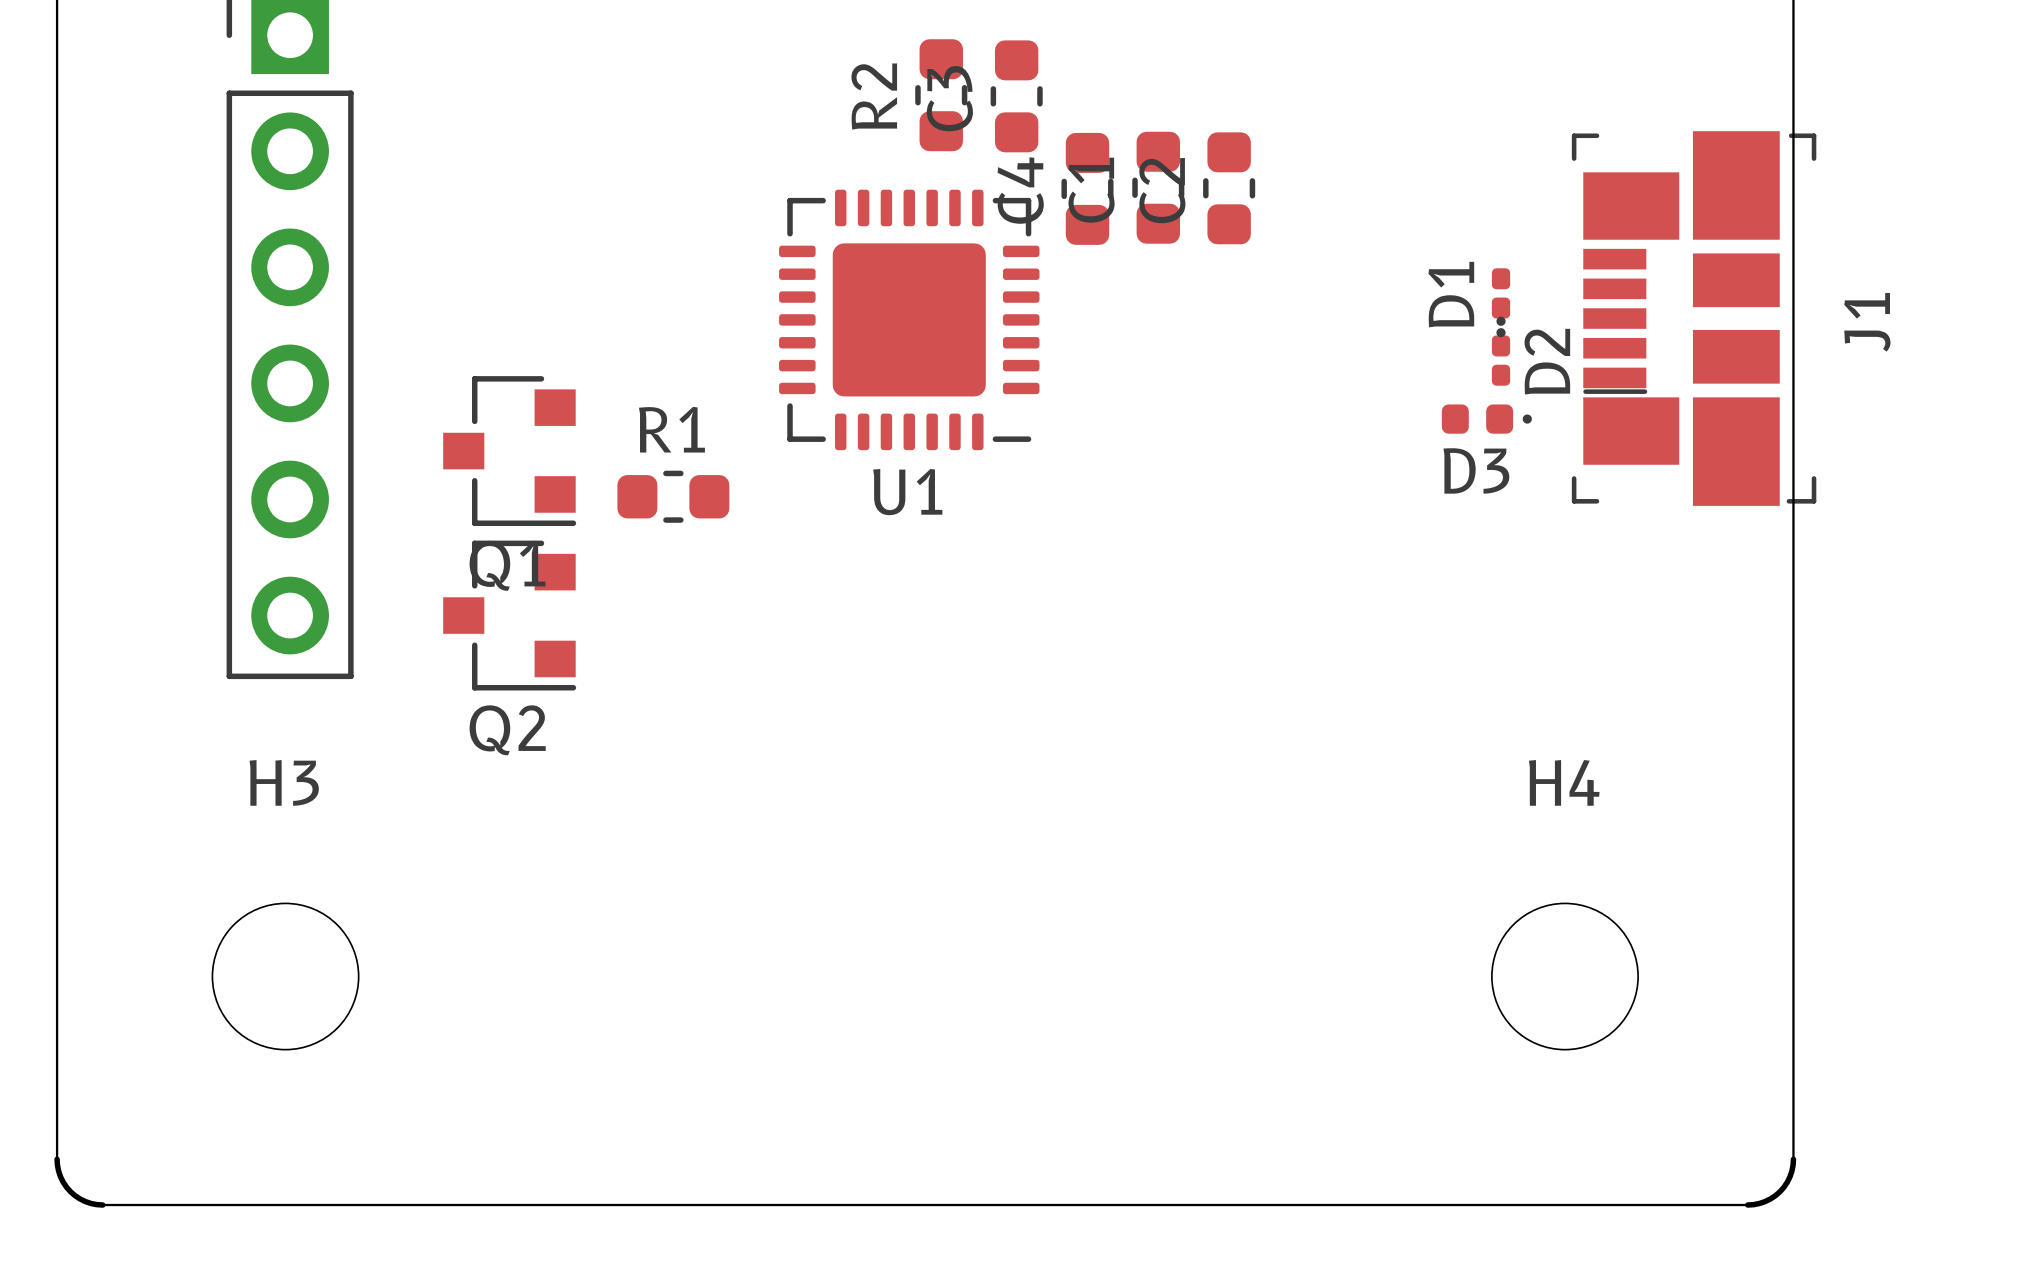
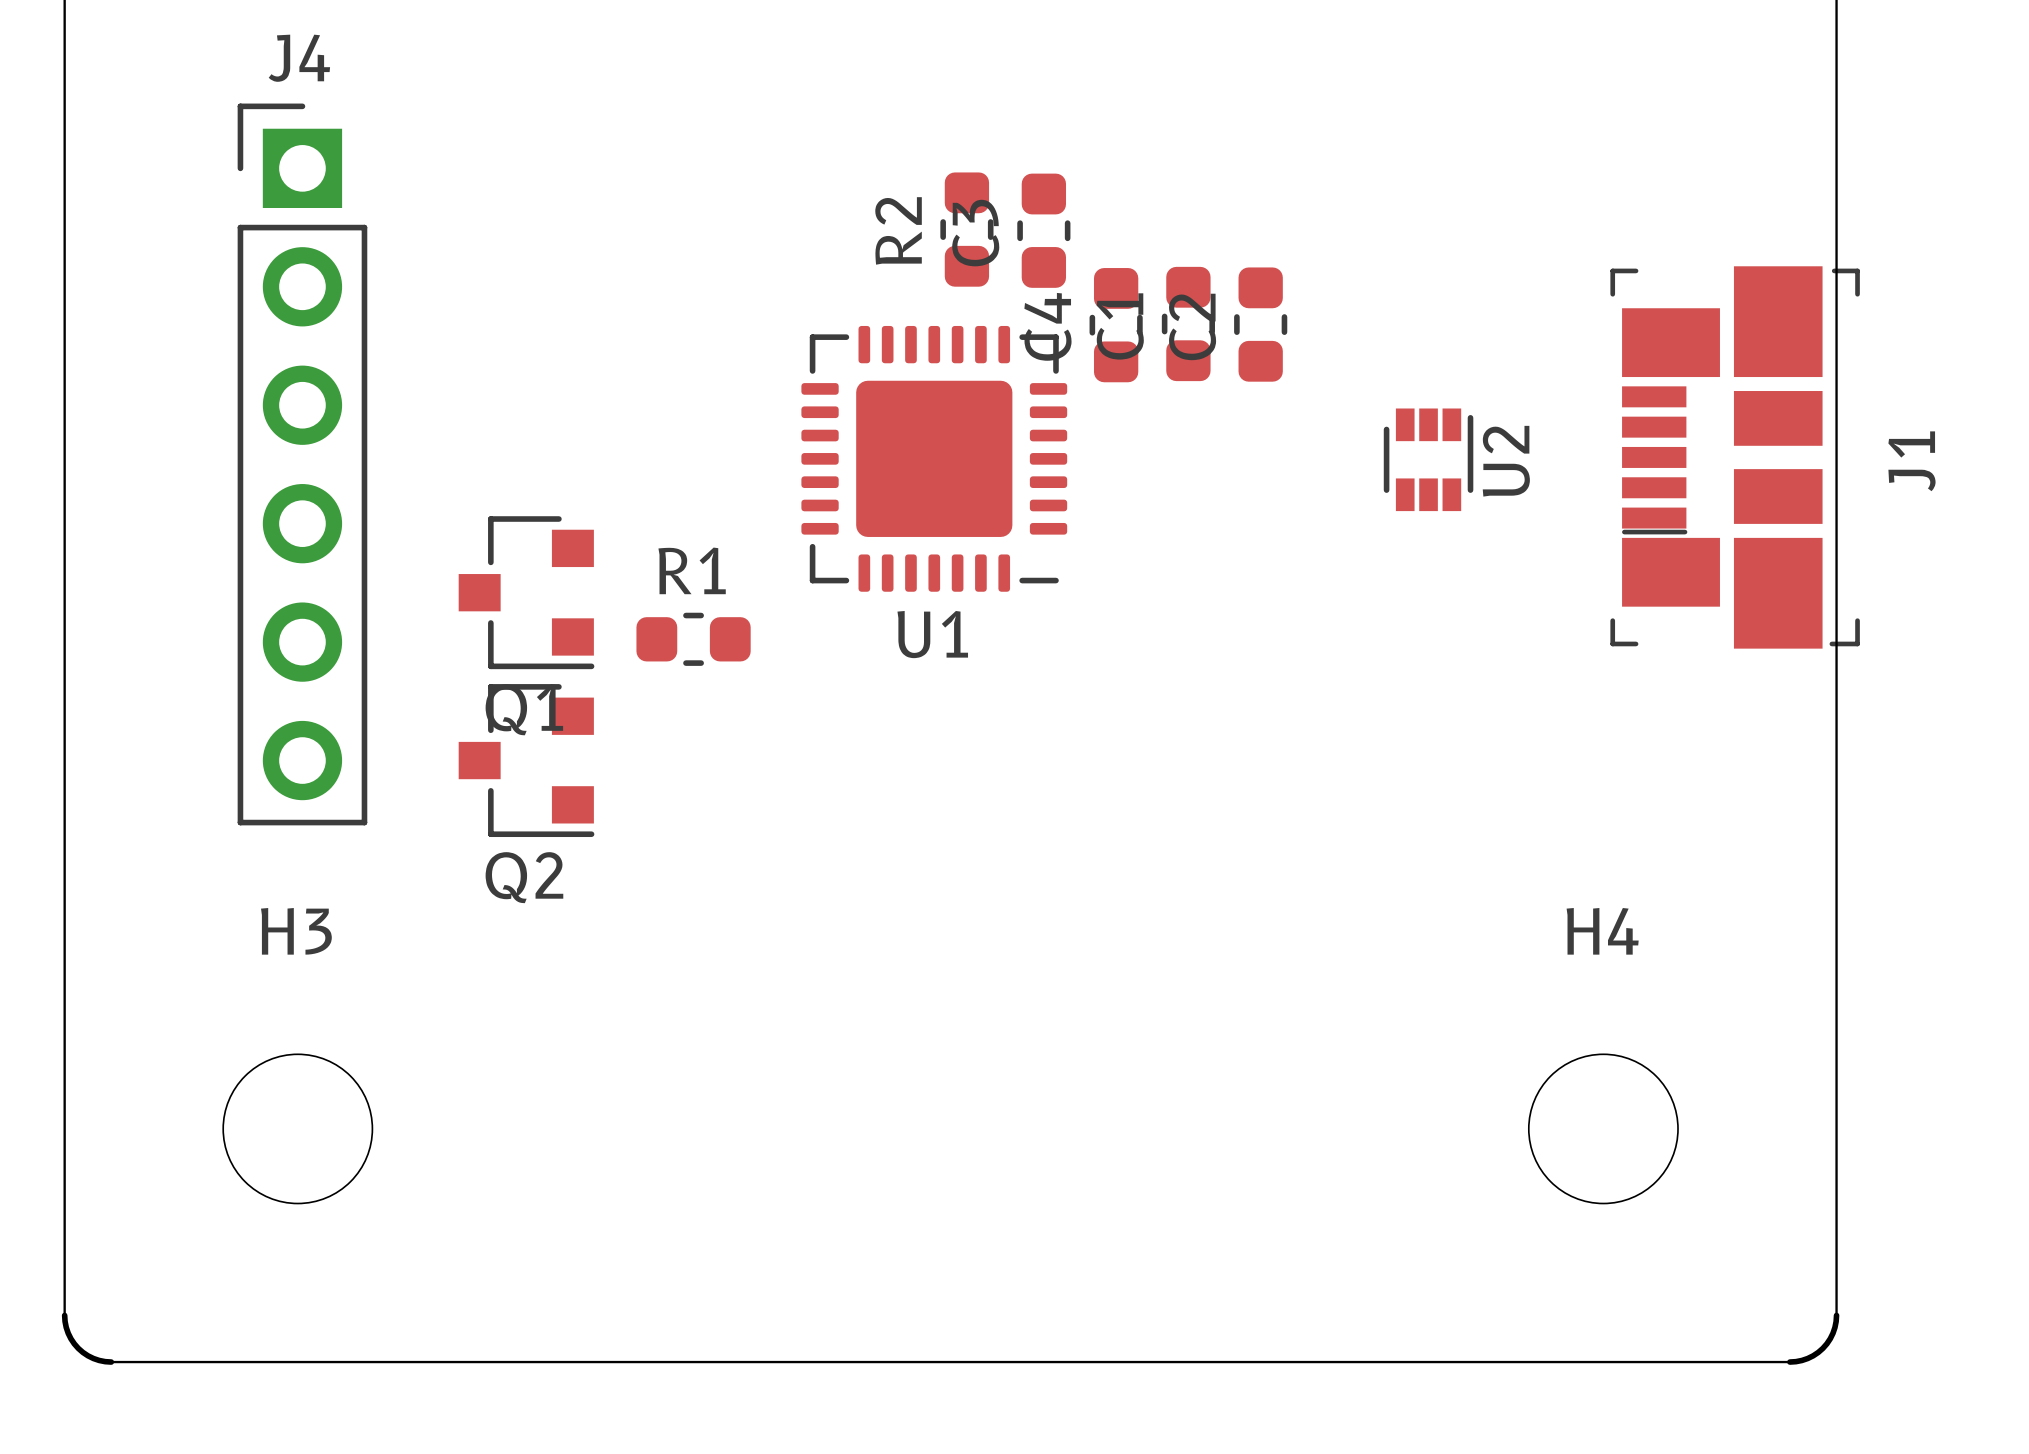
D1: (1501, 302) -> none
U2: none -> (1428, 459)
D2: (1501, 351) -> none
D3: (1486, 419) -> none

